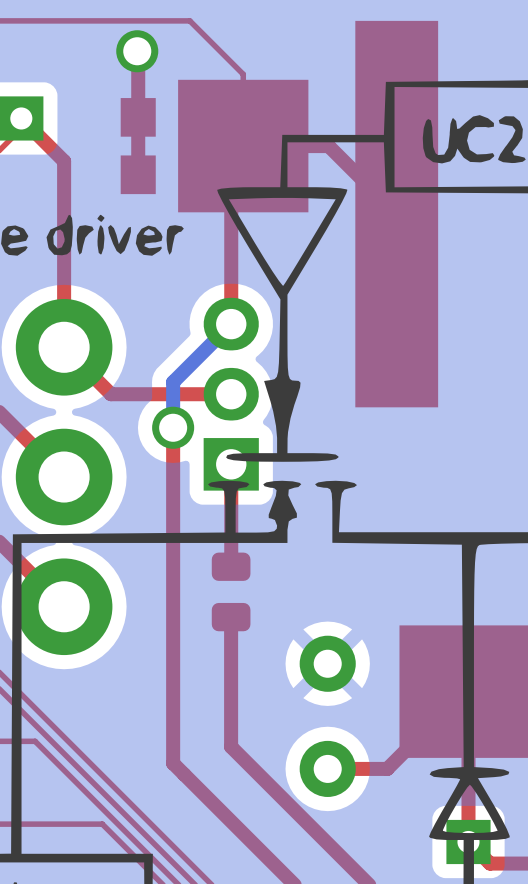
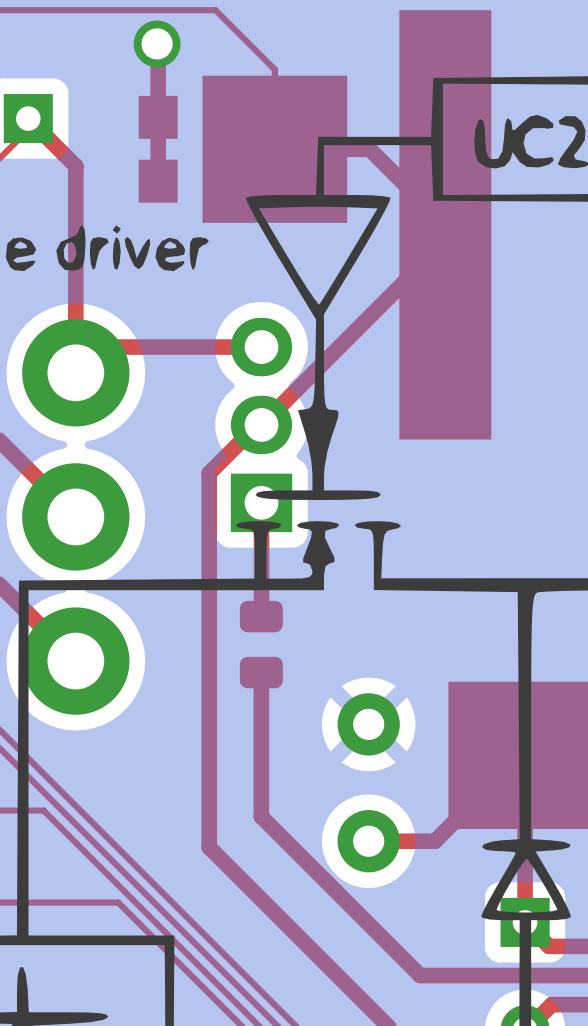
top track: (243, 146) (231, 158) (231, 324) -> none
top track: none -> (445, 224) (445, 241) (261, 424)
bottom track: (231, 324) (173, 382) (173, 427) -> none
top track: (64, 347) (111, 394) (227, 394) -> (75, 372) (101, 347) (261, 347)
top track: (173, 427) (173, 763) (184, 774) -> (257, 424) (209, 473) (209, 847)
via: (173, 427) -> none

